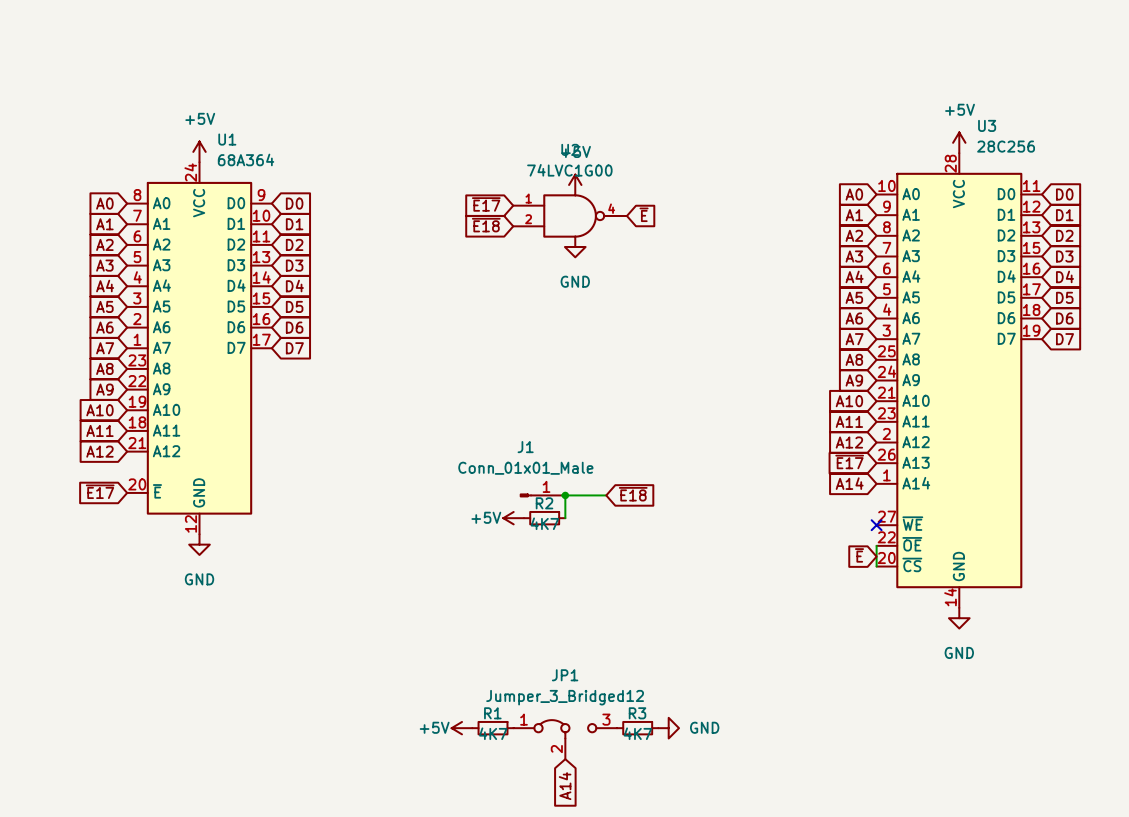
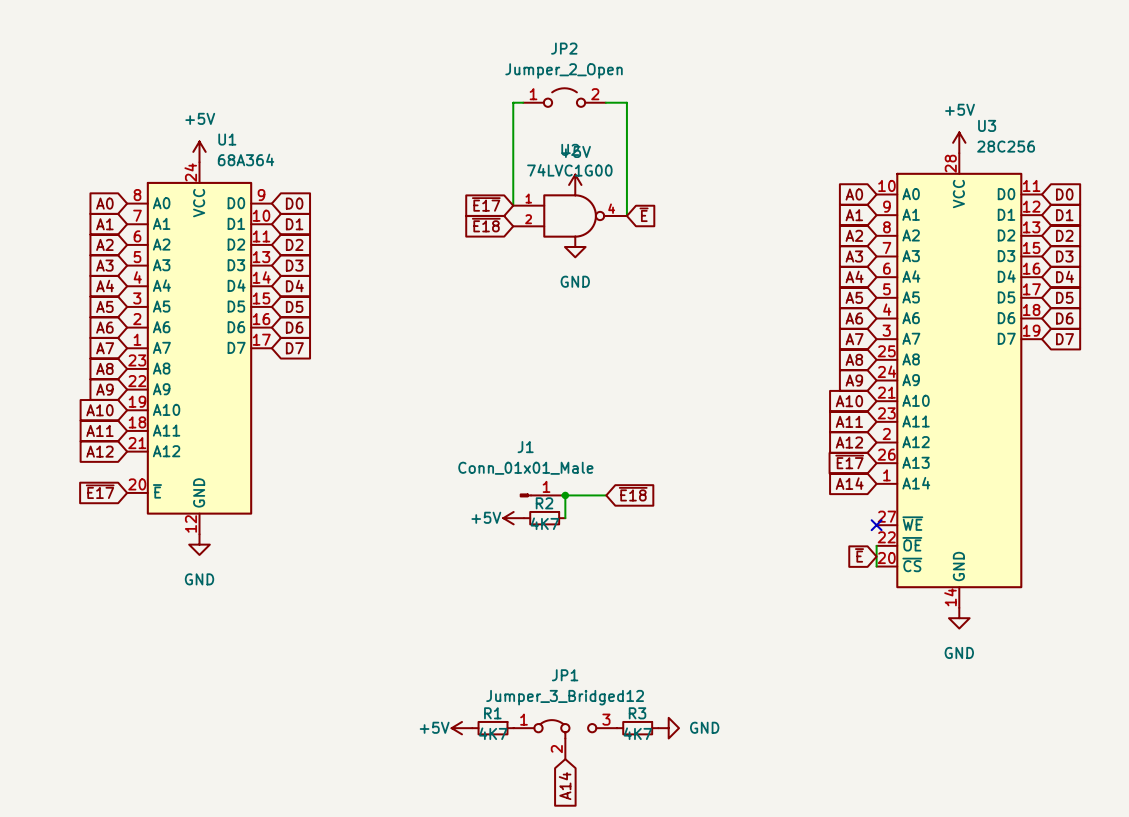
JP2: none -> Jumper_2_Open (564, 97)
wire: none -> (523, 102) (513, 102) (513, 205)
wire: none -> (605, 102) (626, 102) (626, 215)

